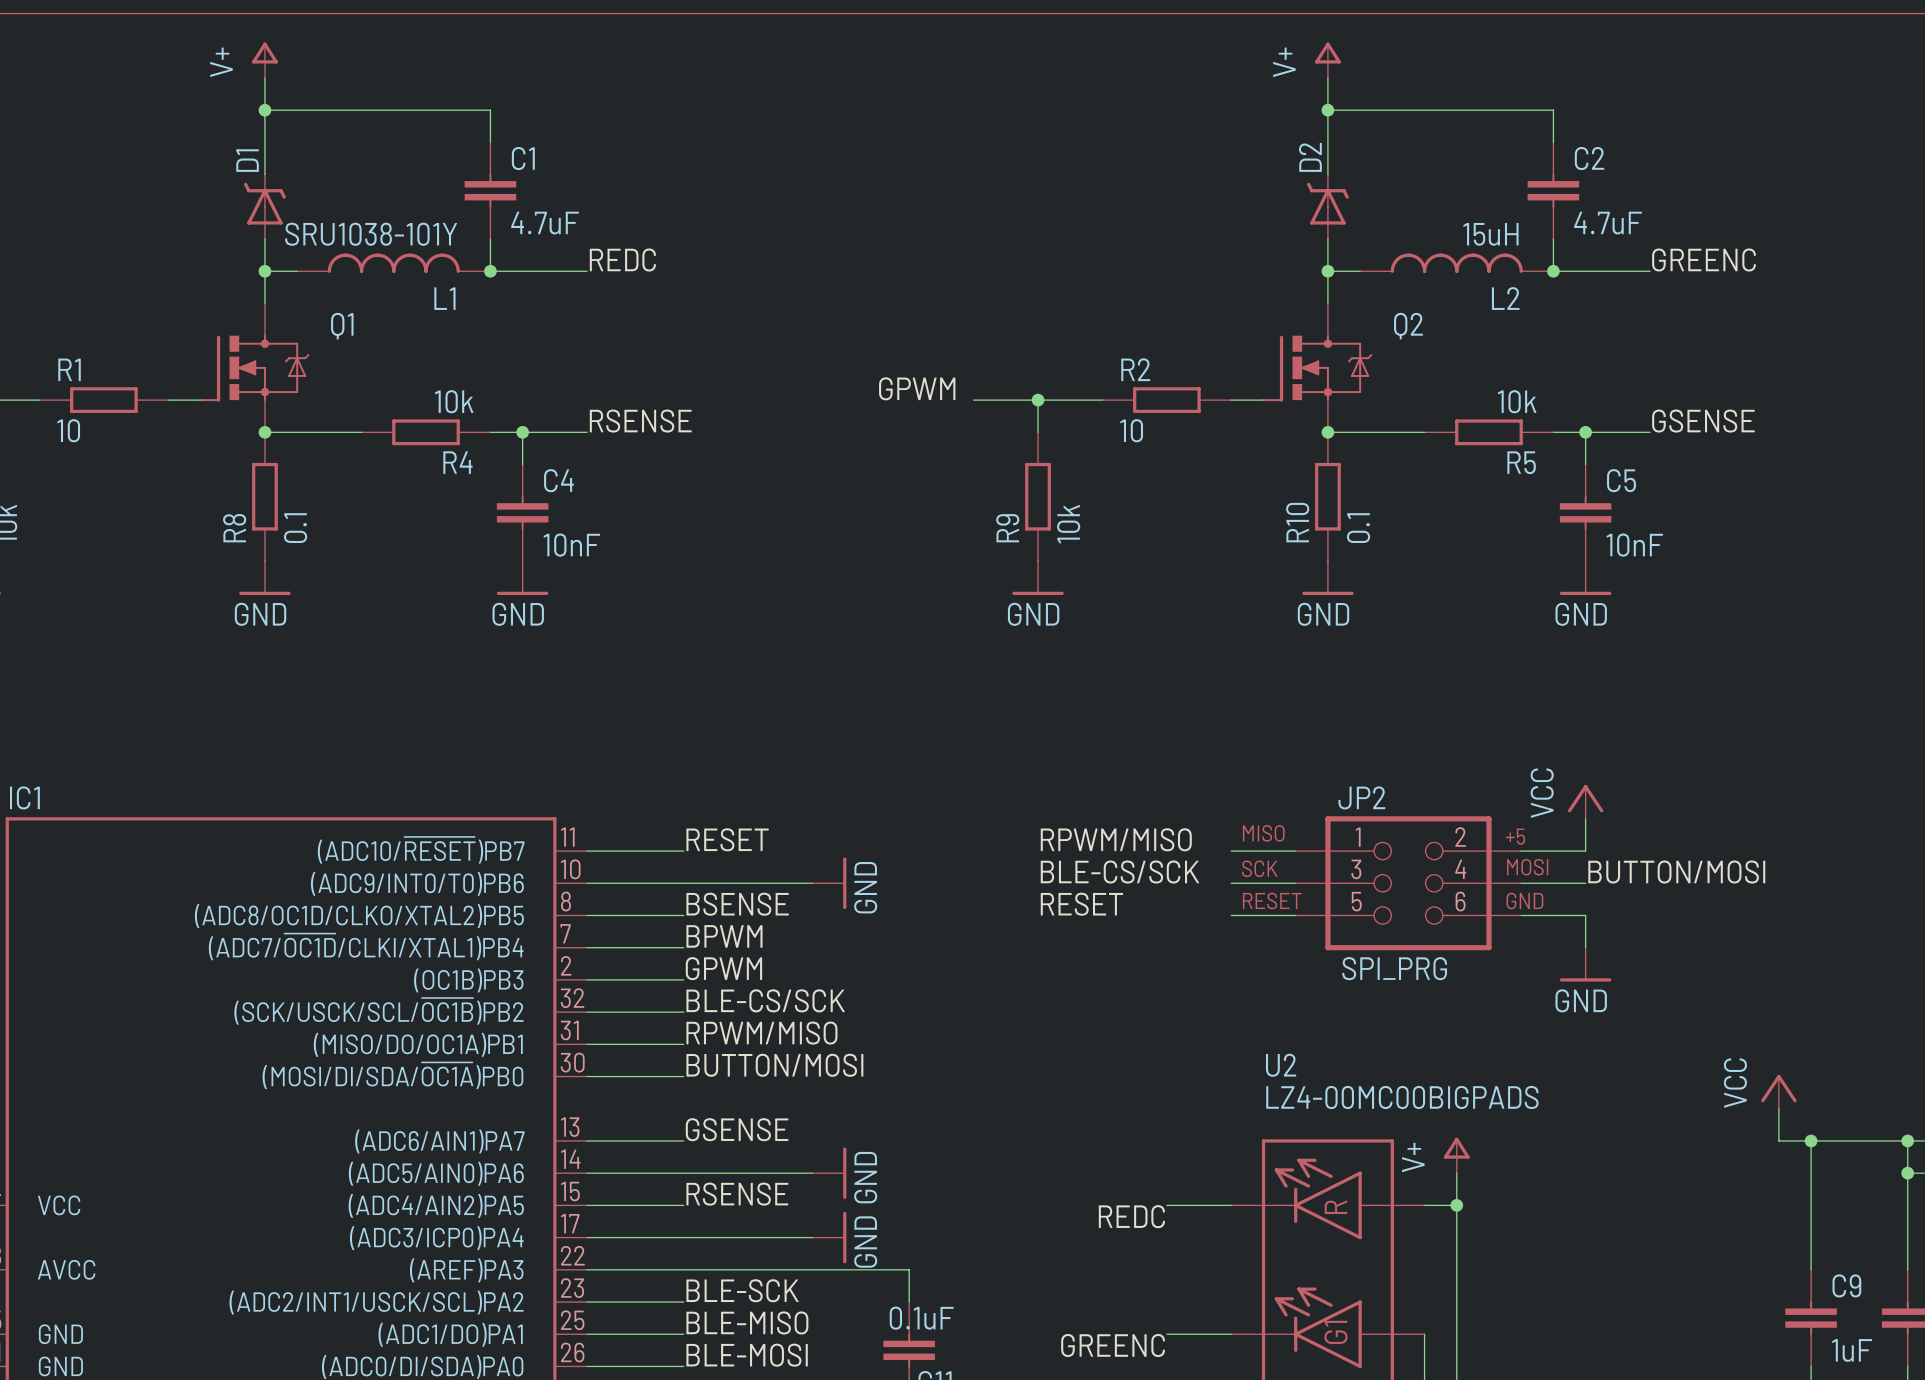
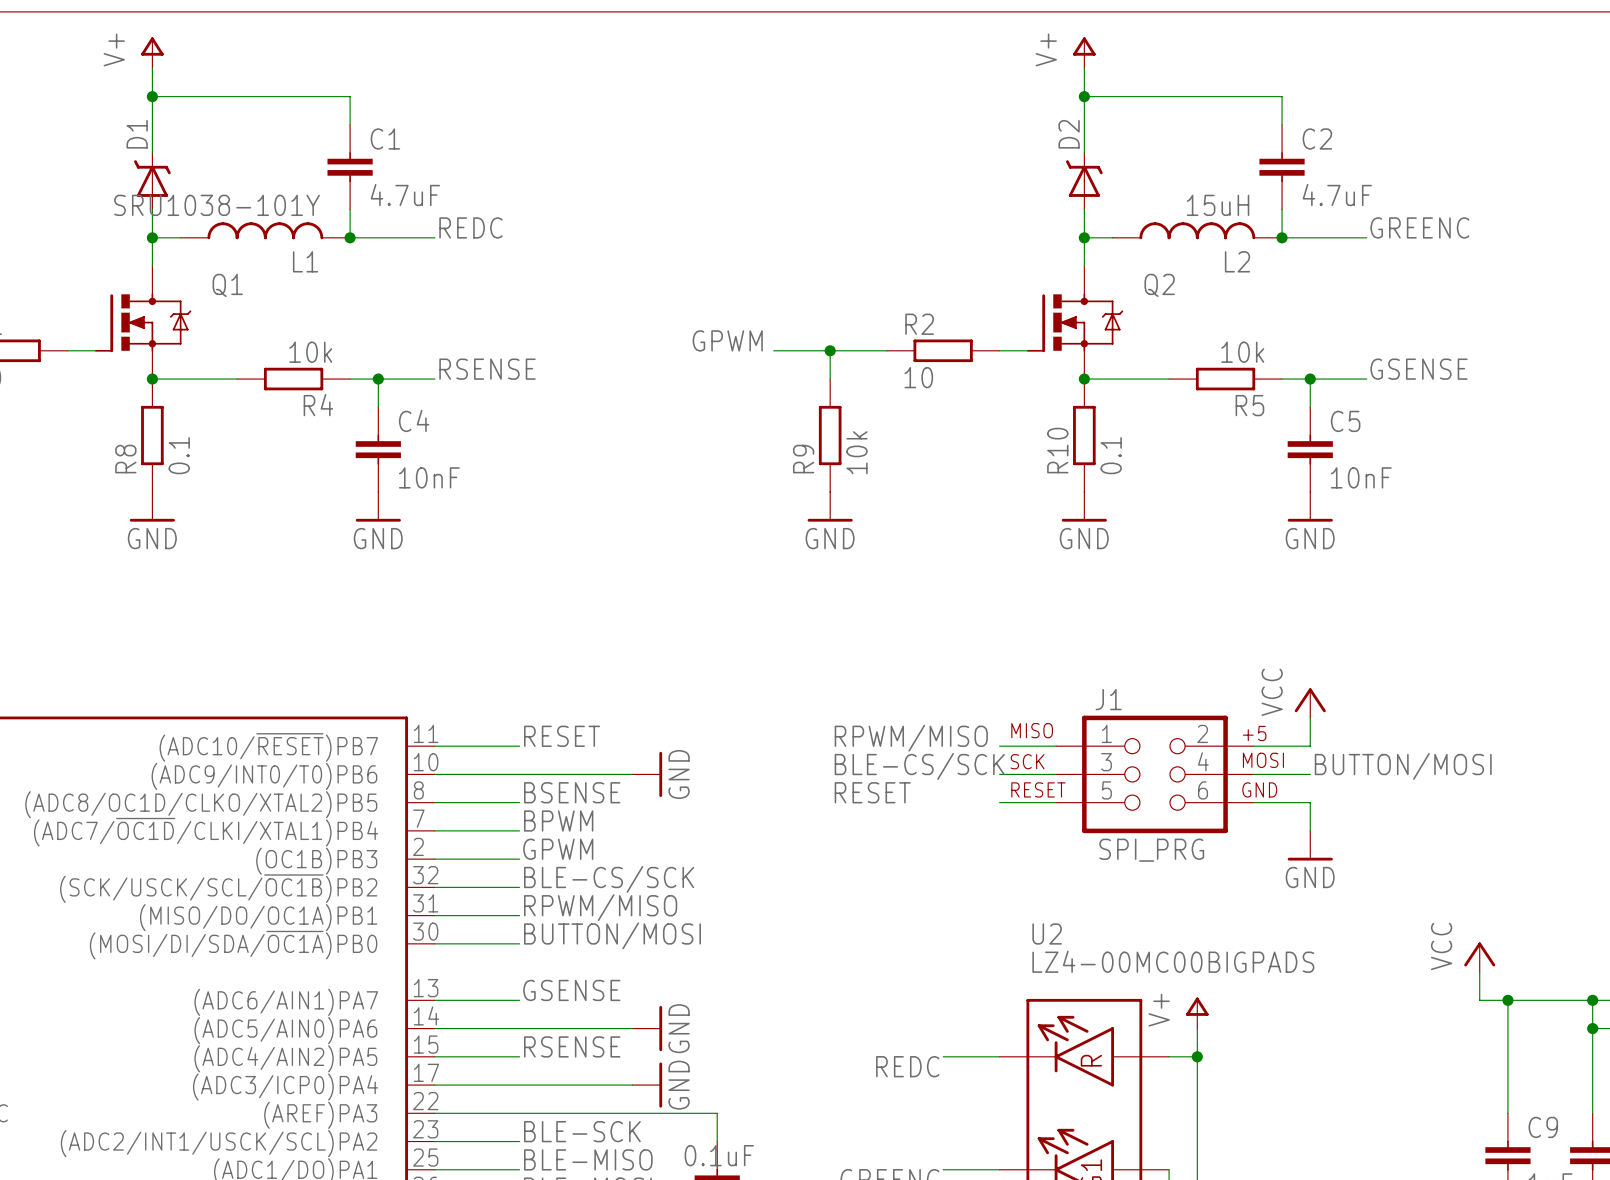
JP2 name: JP2 (1361, 797) -> J1 (1108, 699)

